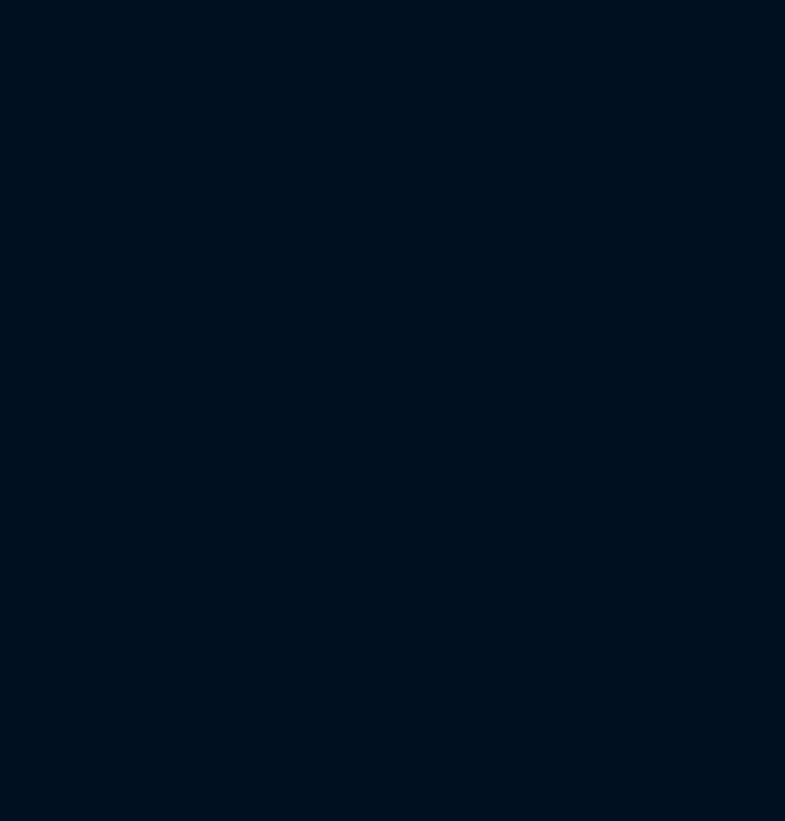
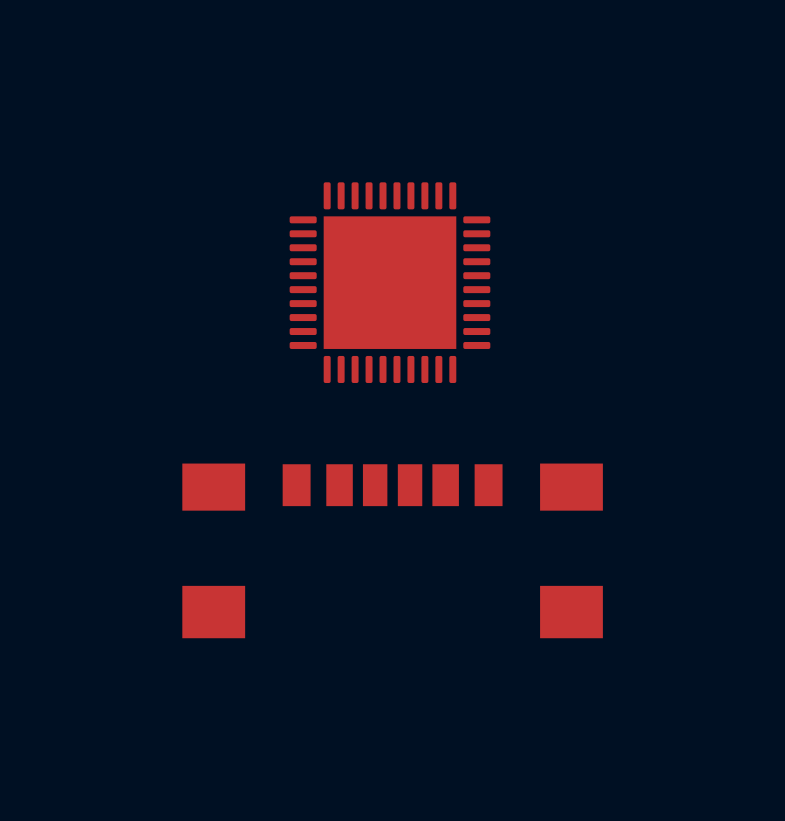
part: none -> (389, 282)
part: none -> (392, 550)

